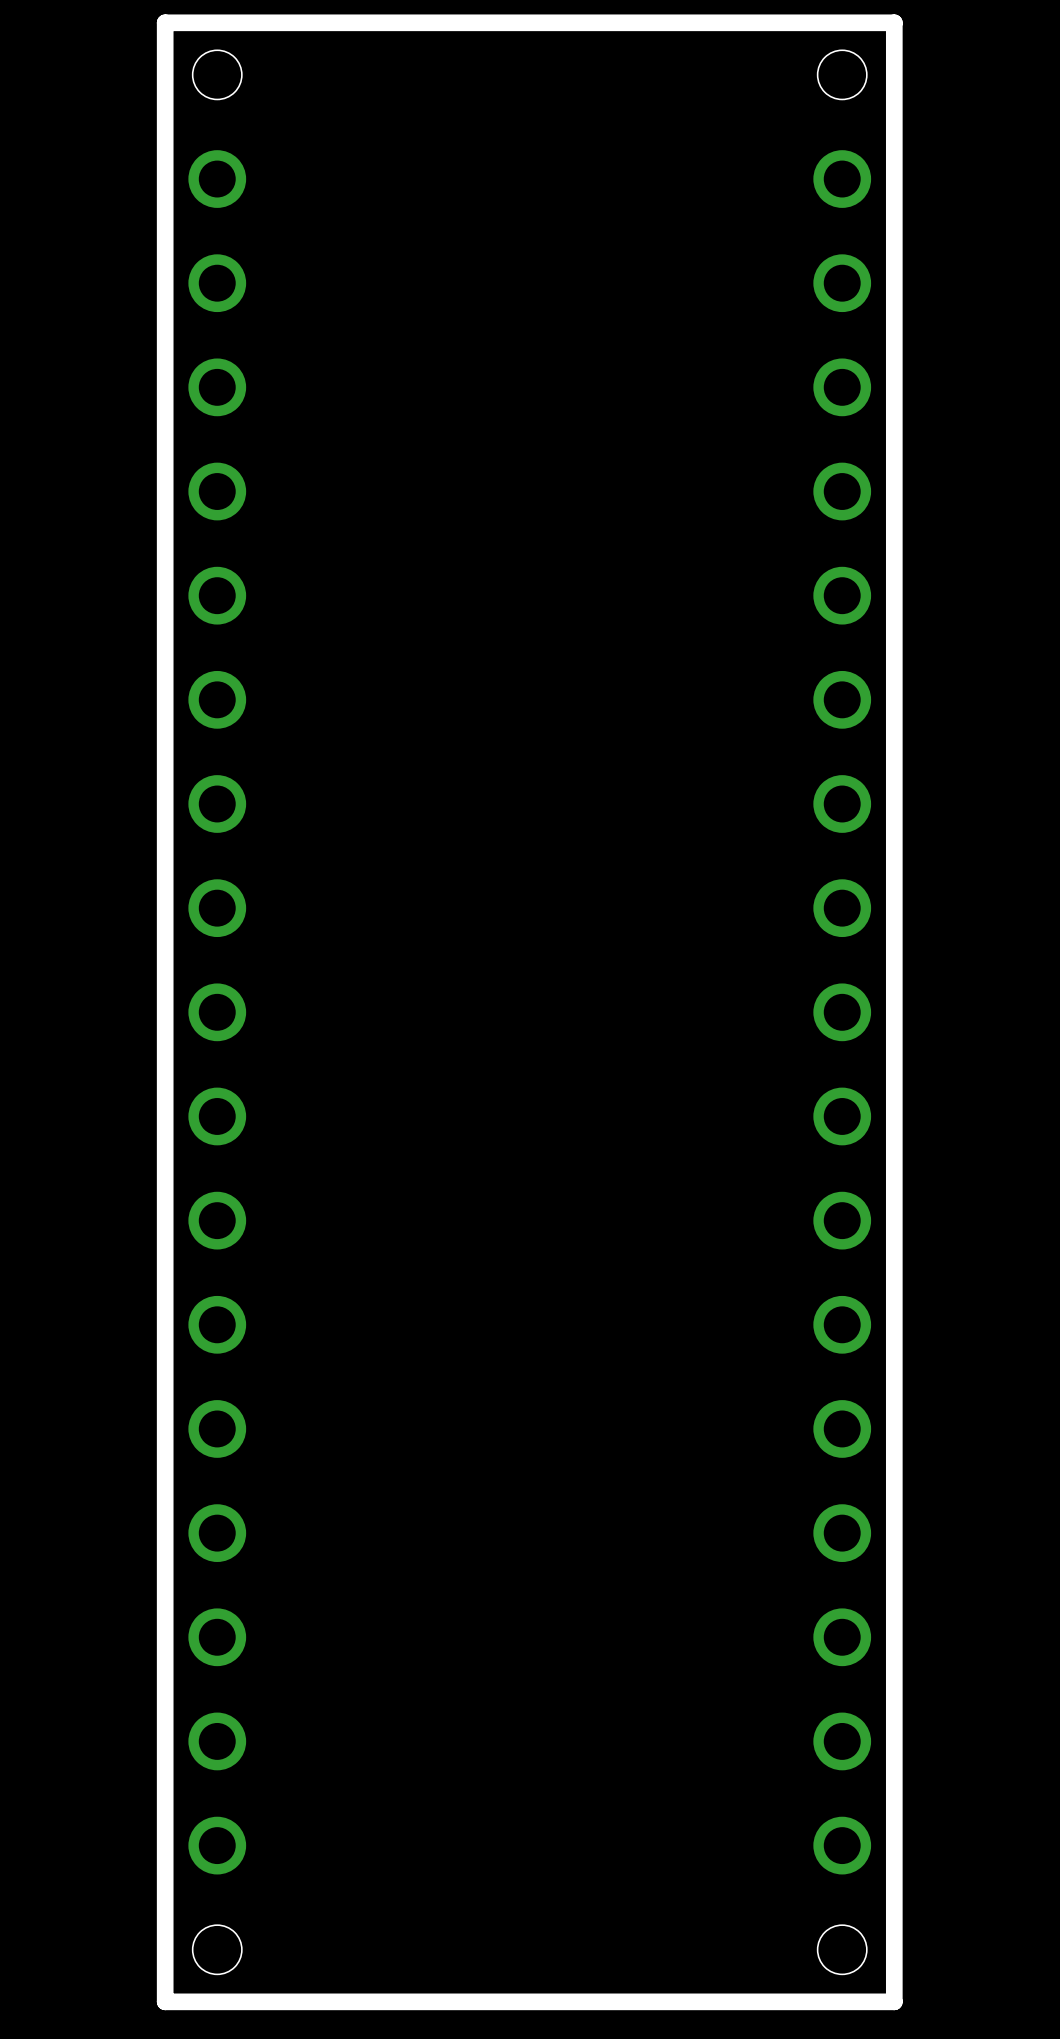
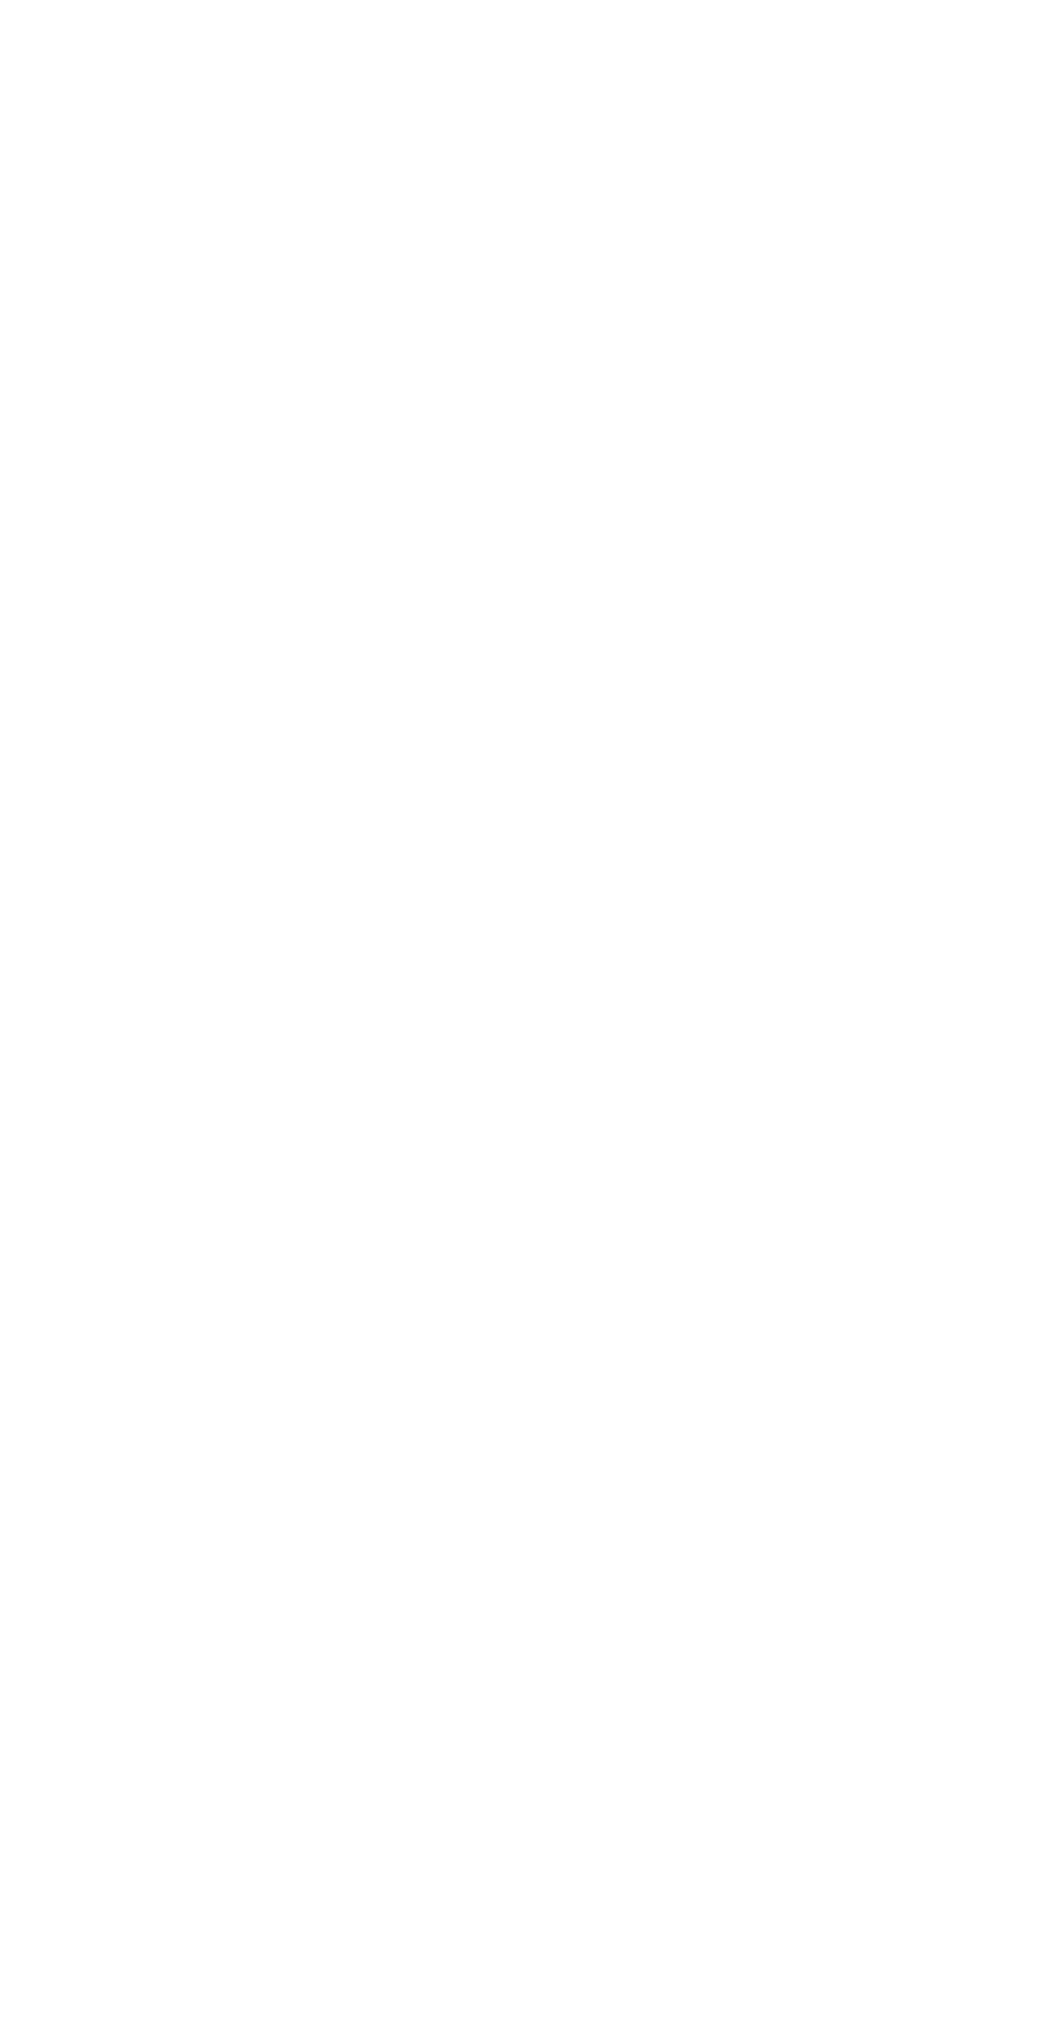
part: (529, 1012) -> none

